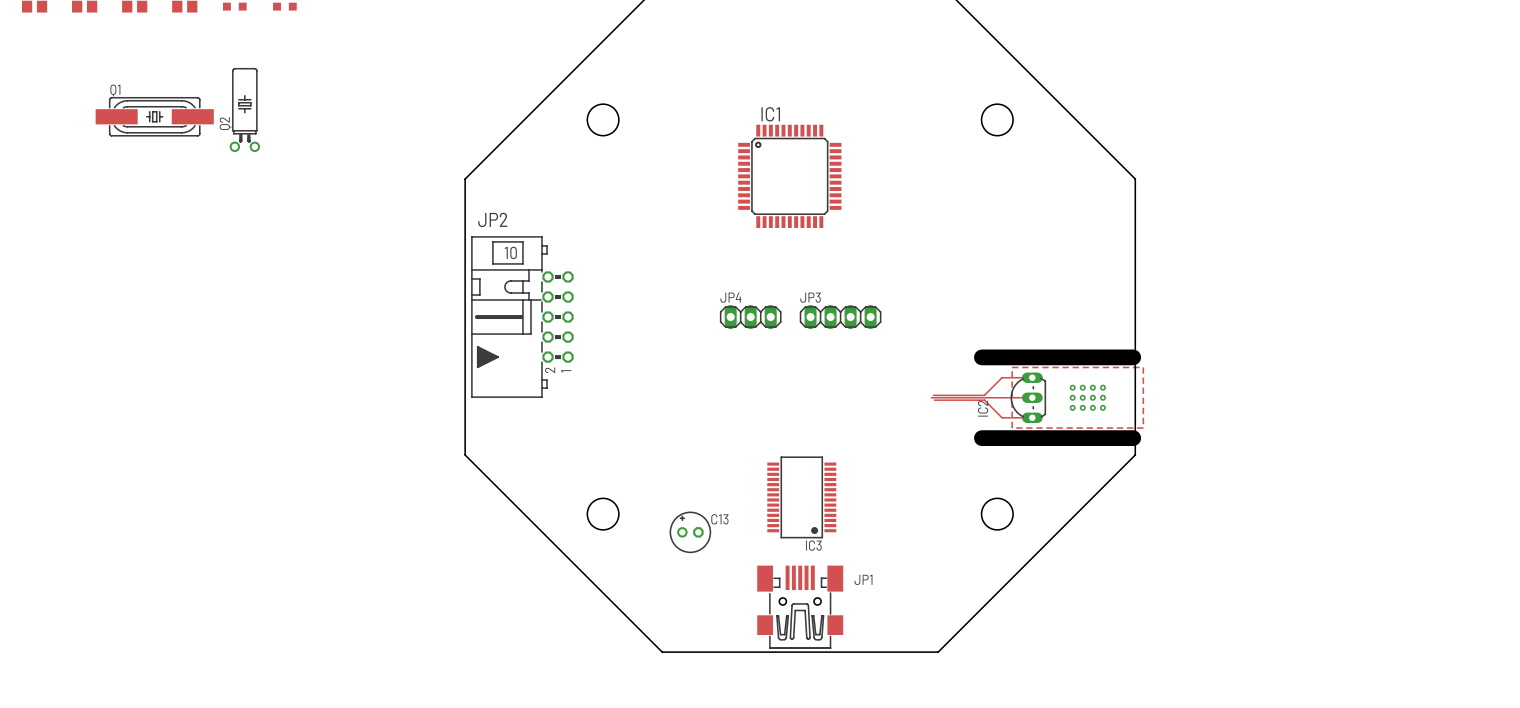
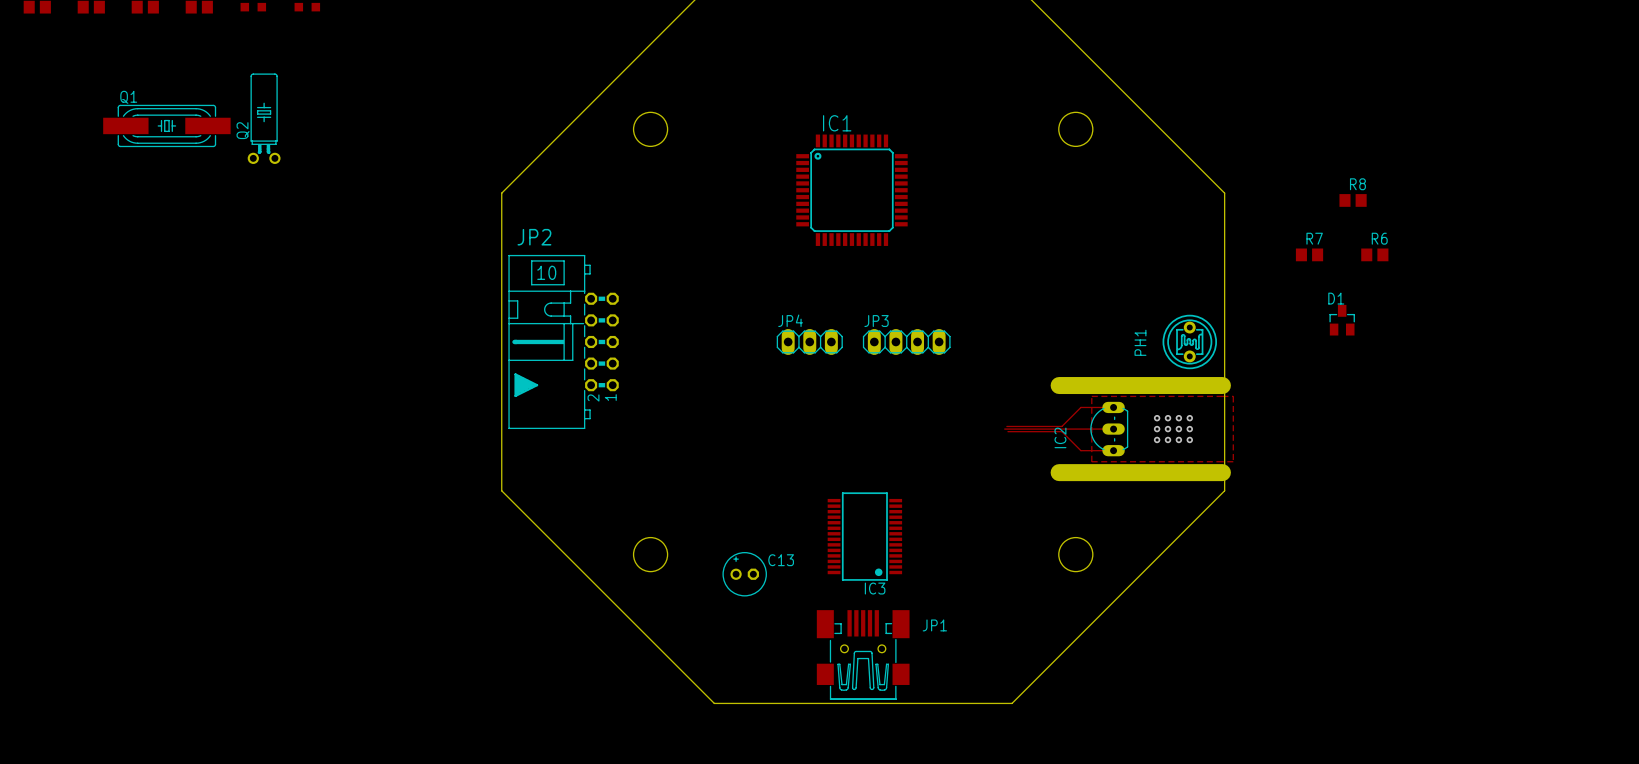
R8: none -> (1353, 200)
R7: none -> (1309, 254)
R6: none -> (1374, 254)
D1: none -> (1342, 320)
PH1: none -> (1189, 341)

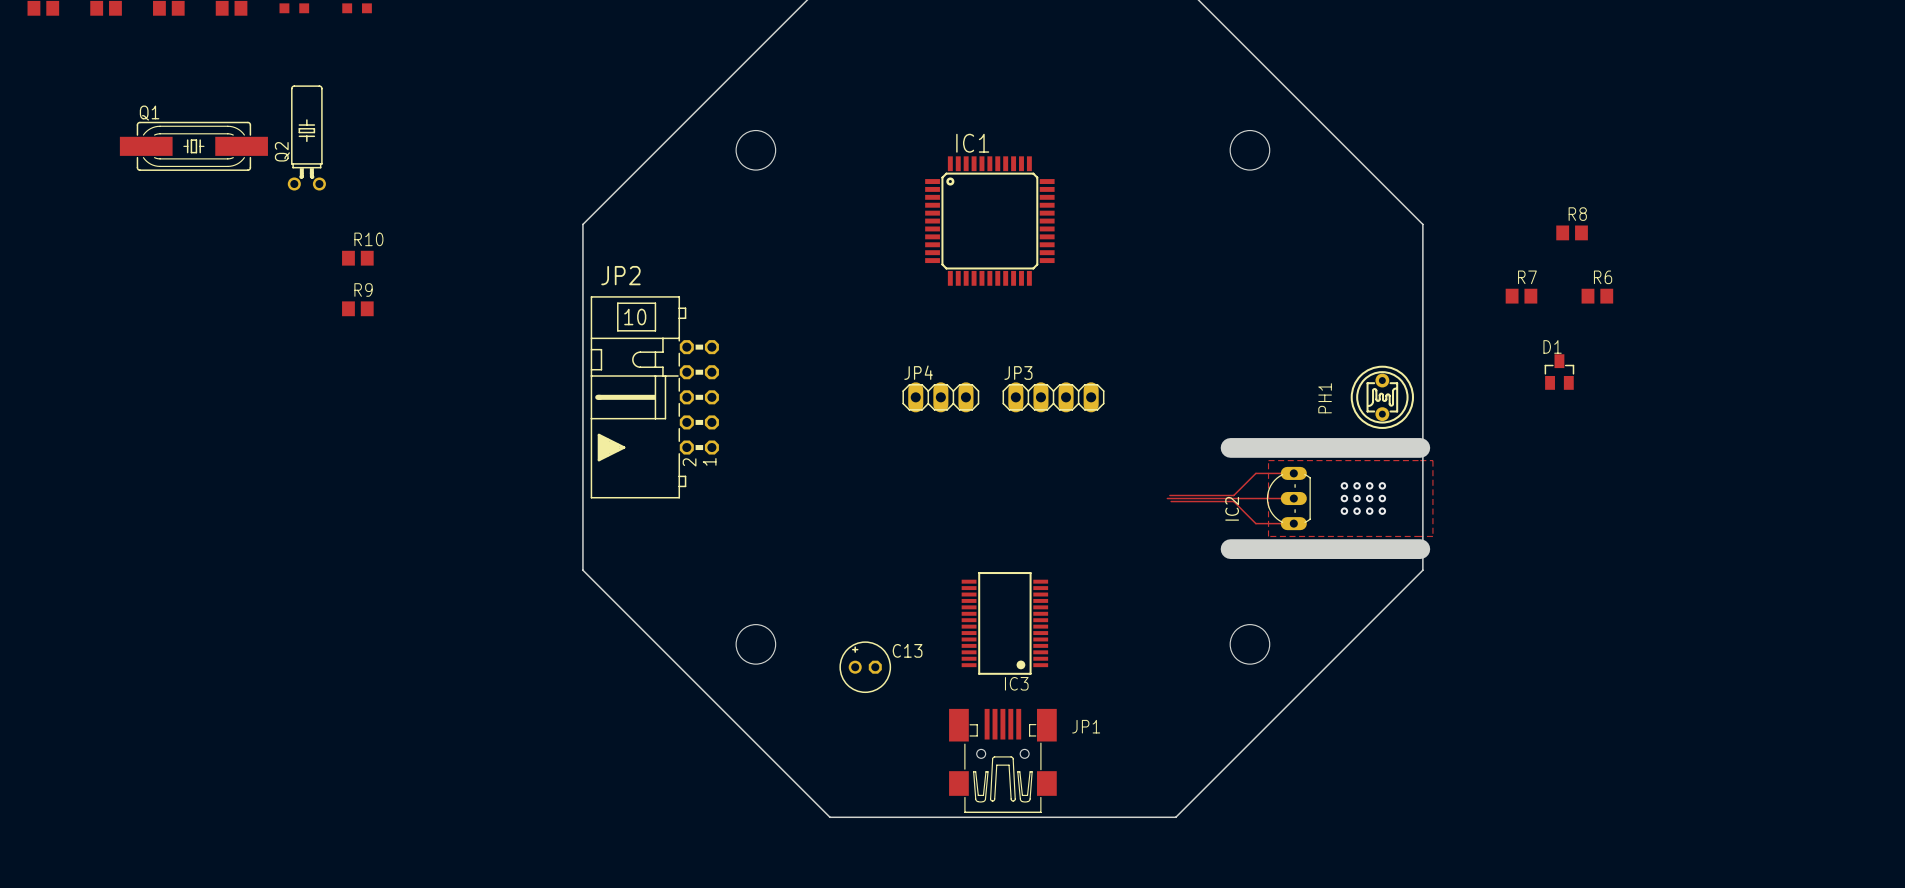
R10: none -> (357, 258)
R9: none -> (357, 308)

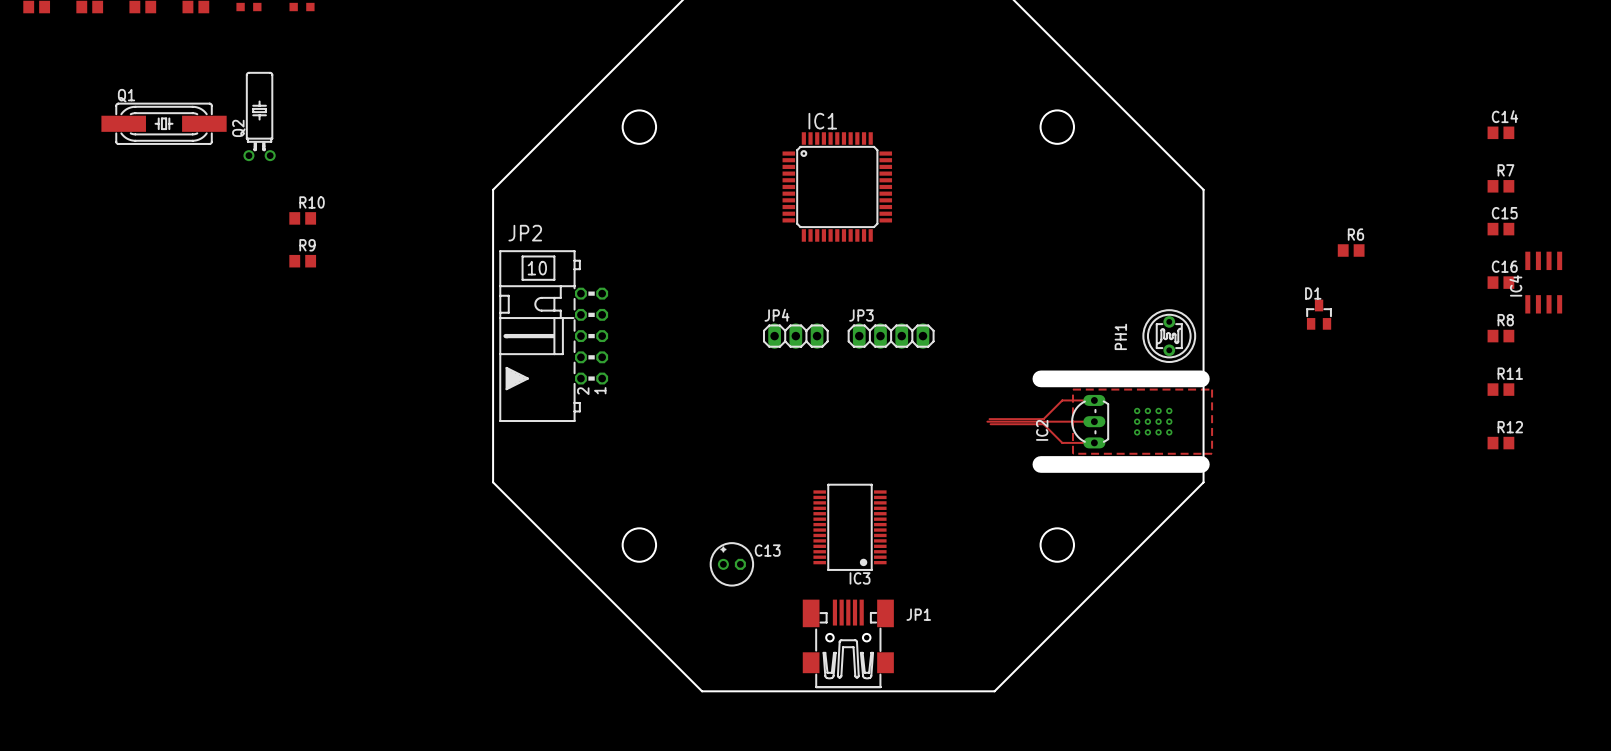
C14: none -> (1500, 132)
R8 position: (1572, 232) -> (1500, 336)
C15: none -> (1500, 229)
R7 position: (1521, 296) -> (1500, 186)
C16: none -> (1500, 282)
IC4: none -> (1543, 282)
R11: none -> (1500, 389)
R12: none -> (1500, 443)

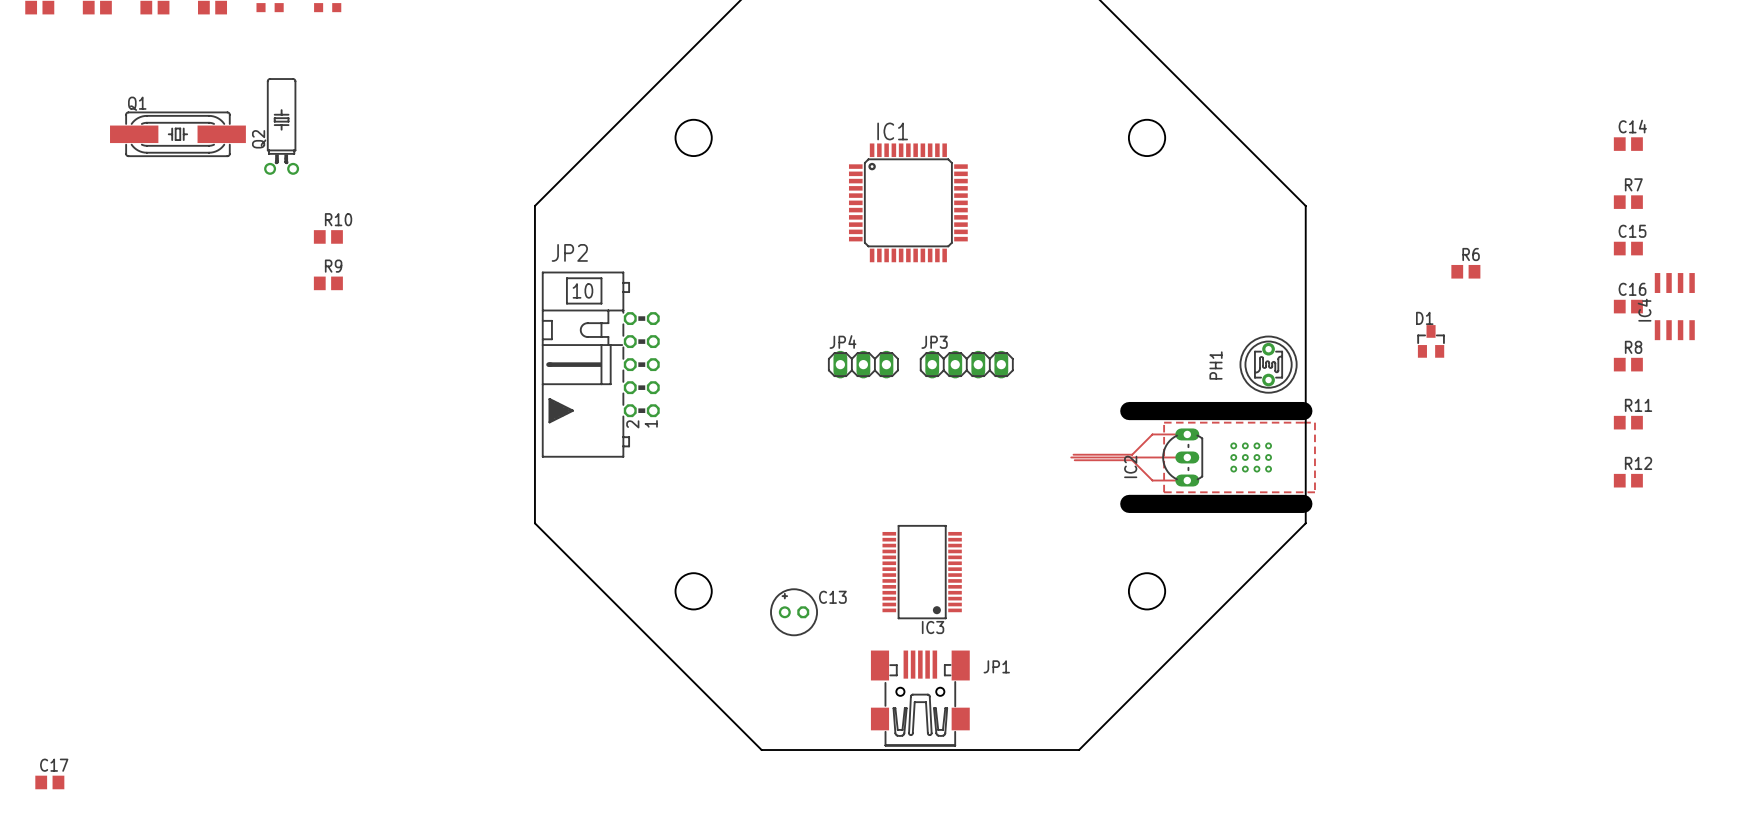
C17: none -> (49, 782)

